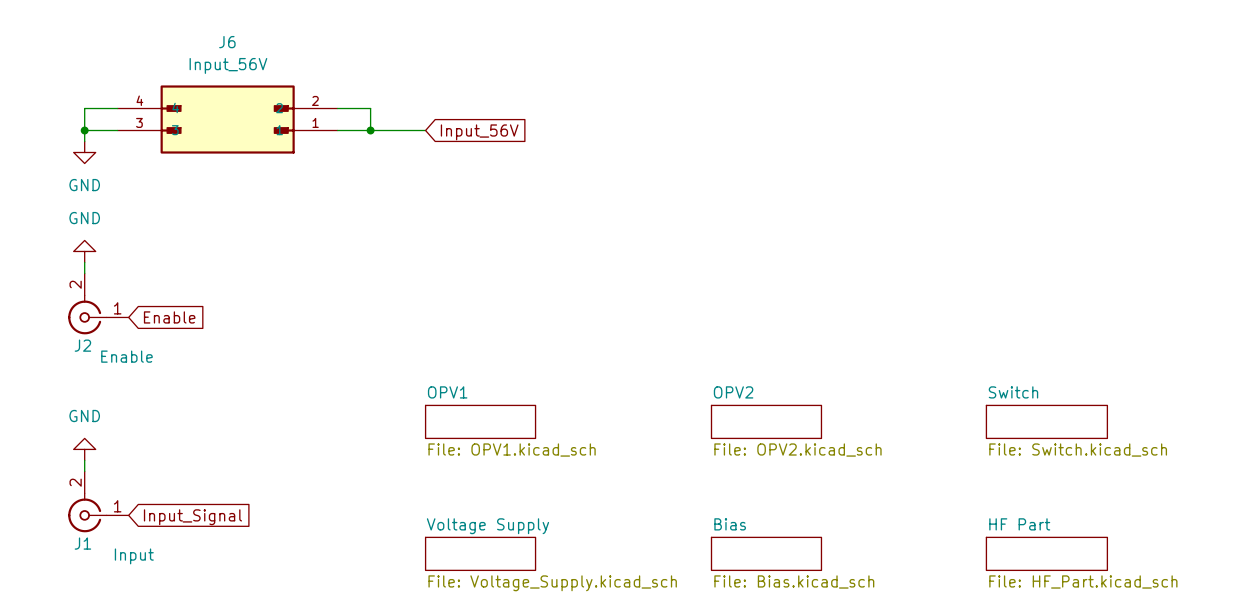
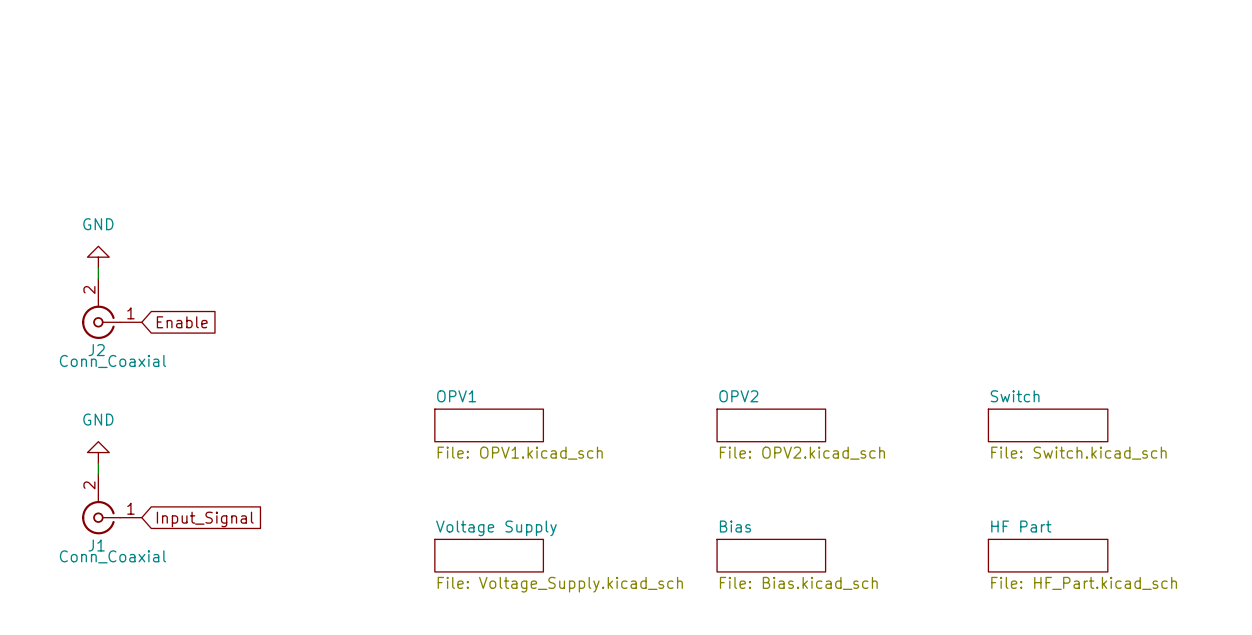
wire: (117, 108) (84, 108) (84, 141) -> none
wire: (337, 108) (370, 108) (370, 130) -> none
J6: Input_56V (227, 119) -> none
wire: (84, 130) (117, 130) -> none
junction: (84, 130) -> none
wire: (337, 130) (425, 130) -> none
junction: (370, 130) -> none
global label: Input_56V (479, 132) -> none
power symbol: GND (84, 152) -> none
J2 value: Enable (126, 356) -> Conn_Coaxial (112, 361)
J1 value: Input (134, 556) -> Conn_Coaxial (112, 556)

